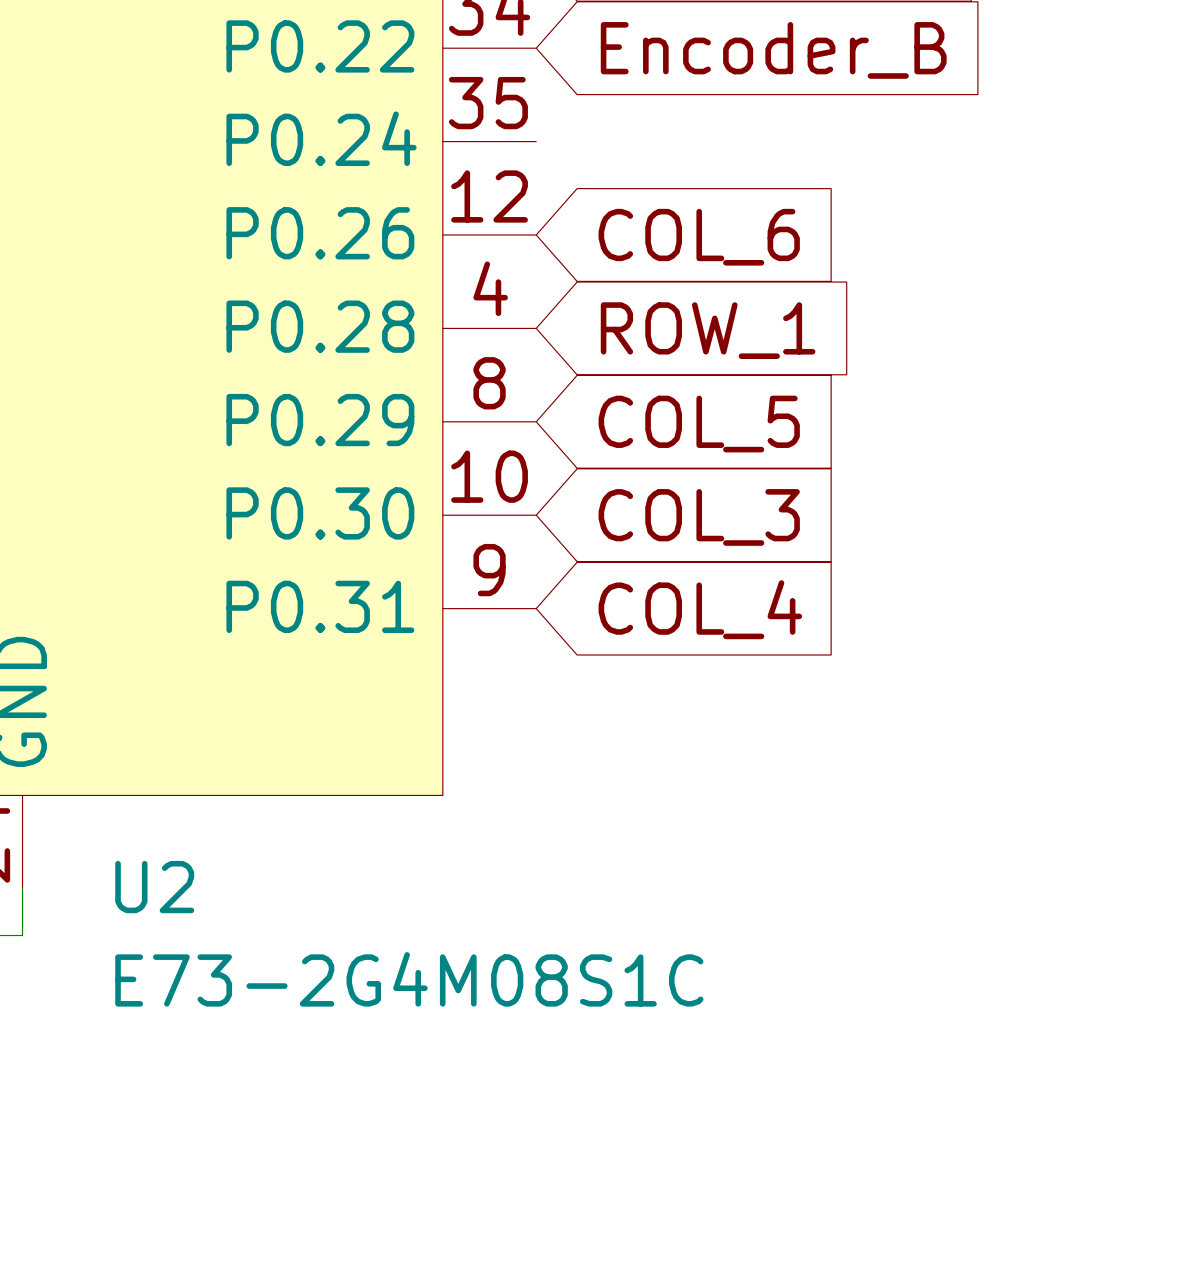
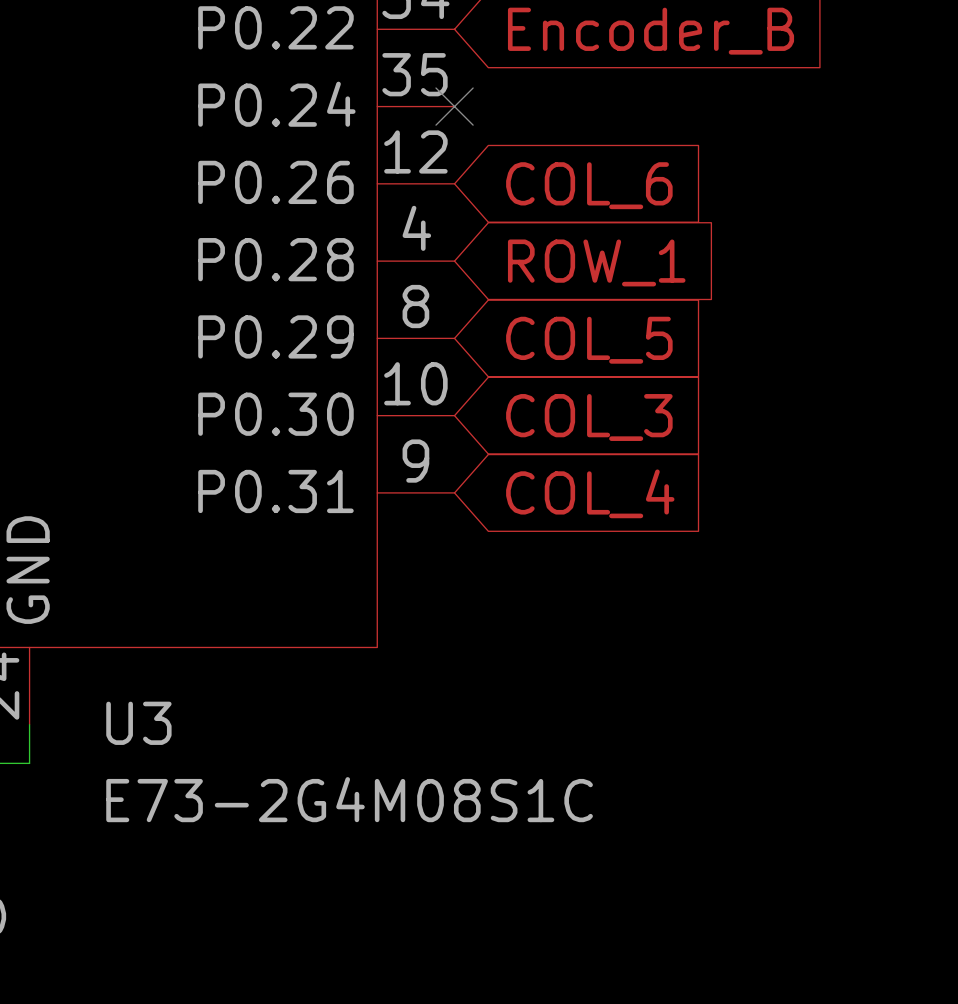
no-connect mark: none -> (454, 106)
U2 name: U2 (154, 887) -> U3 (138, 723)

